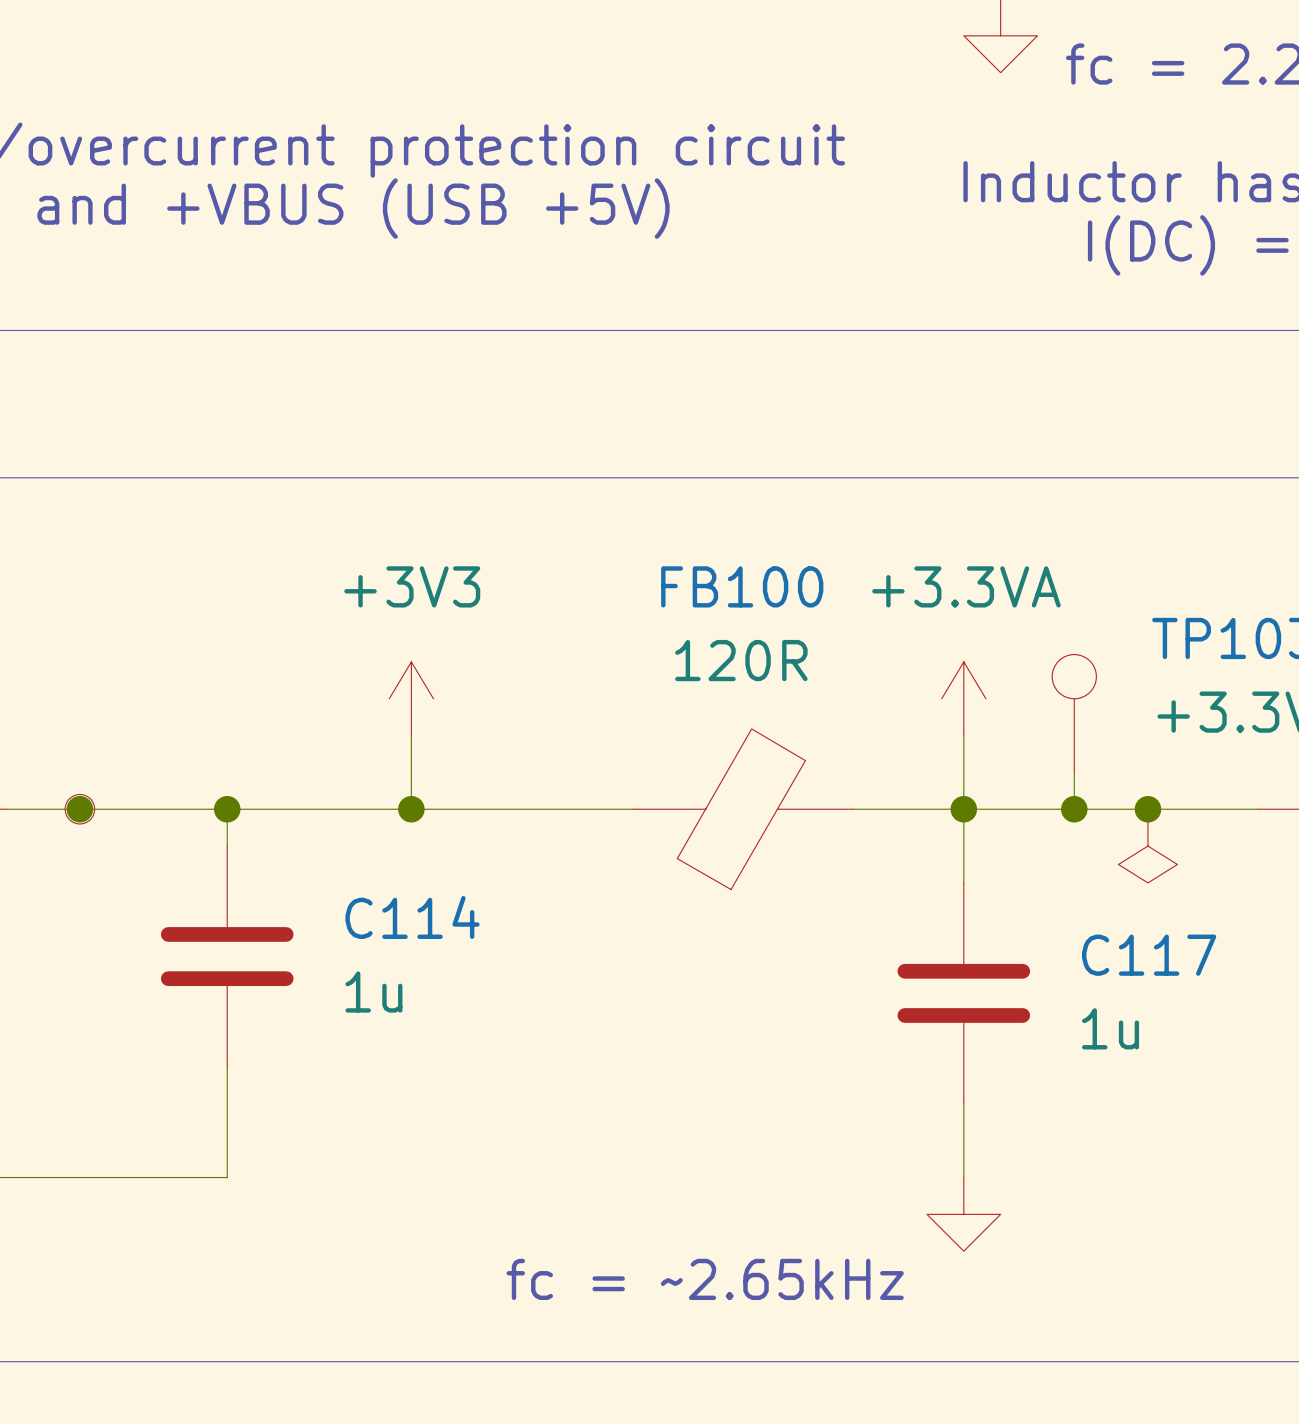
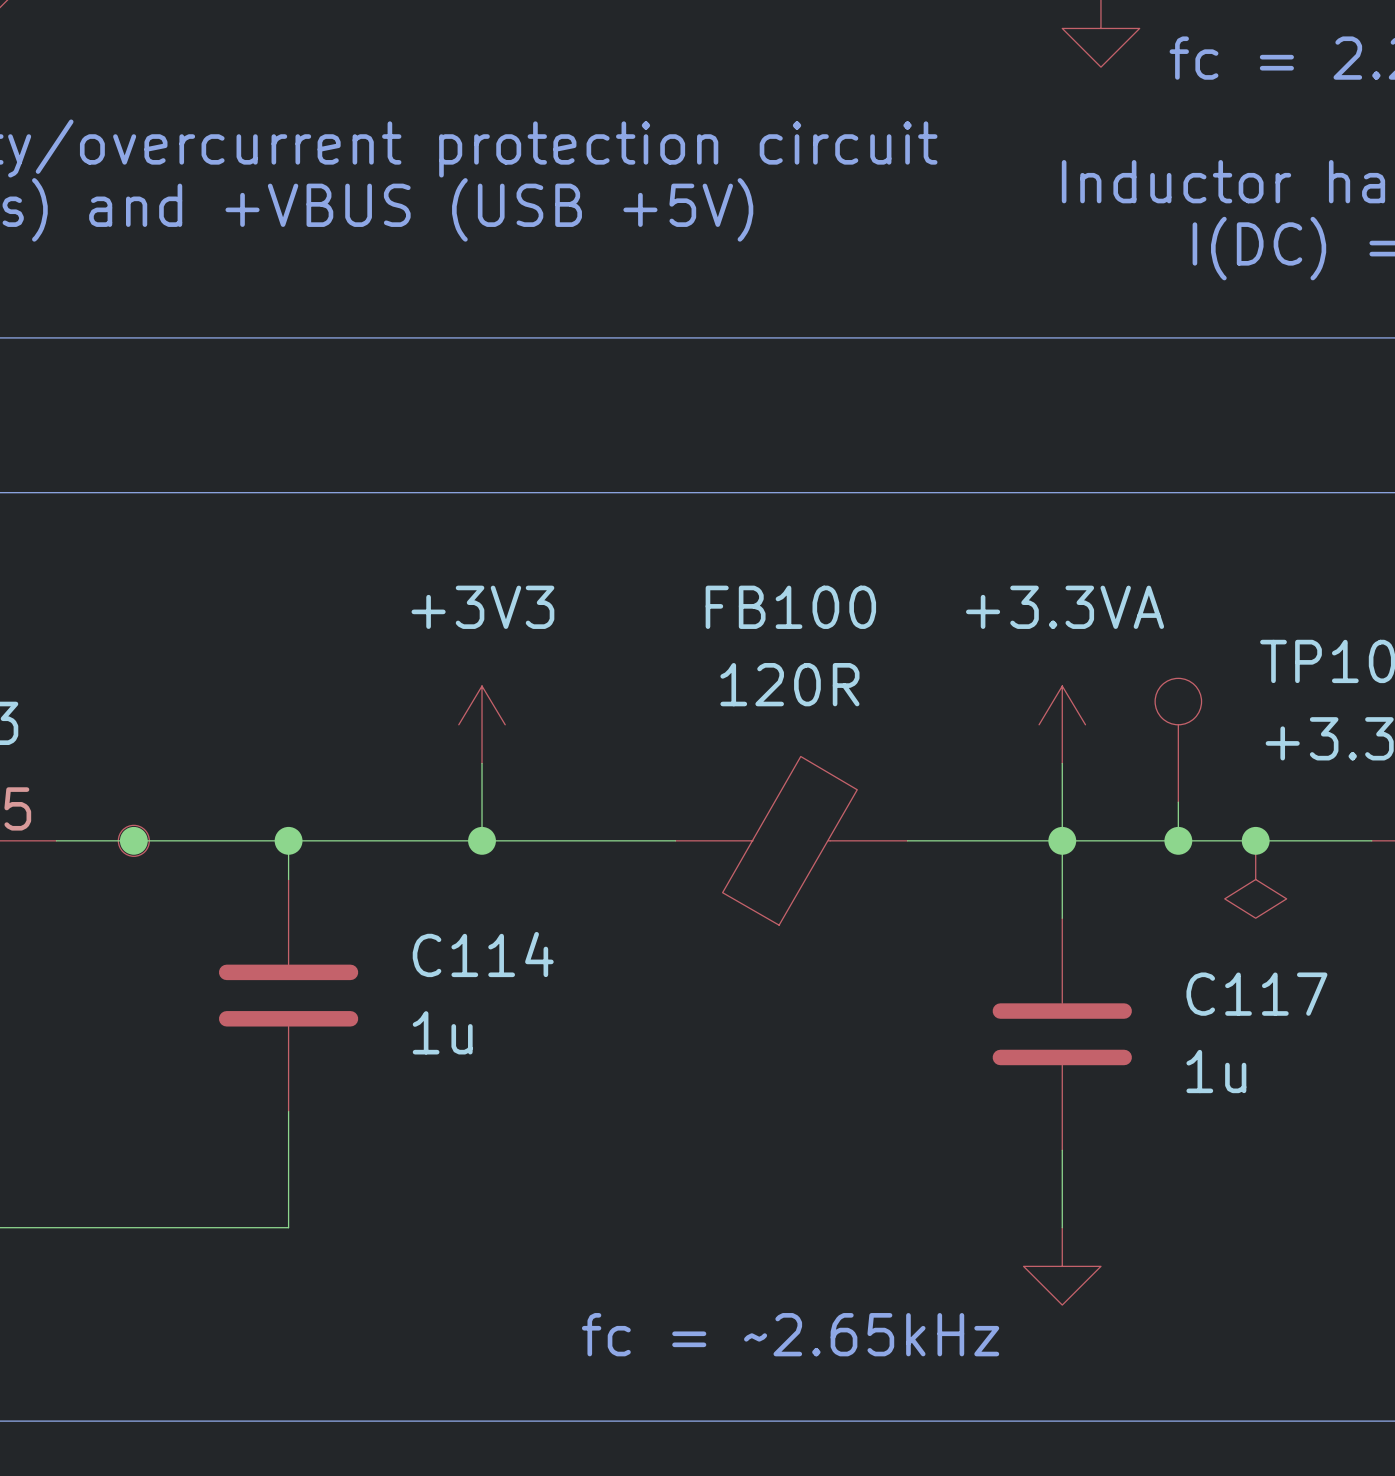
FB100 position: (742, 809) -> (791, 840)

